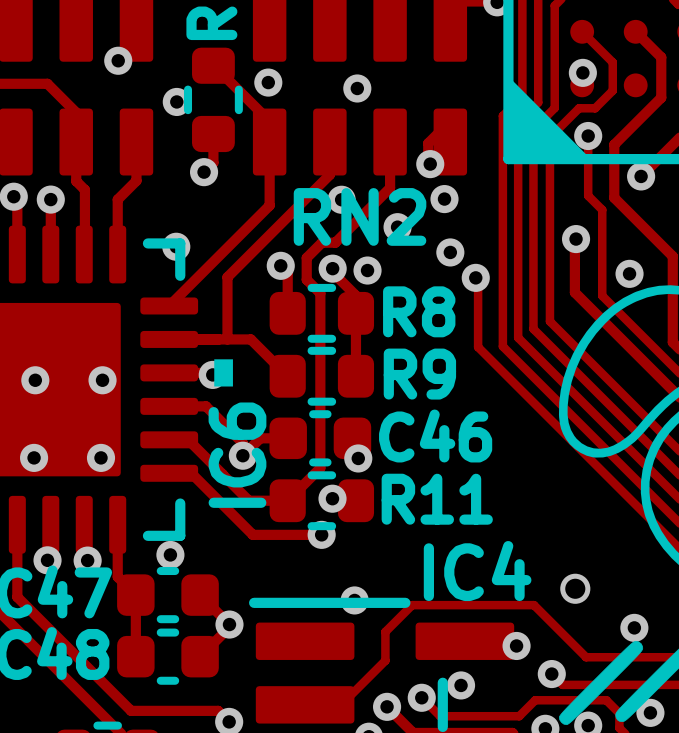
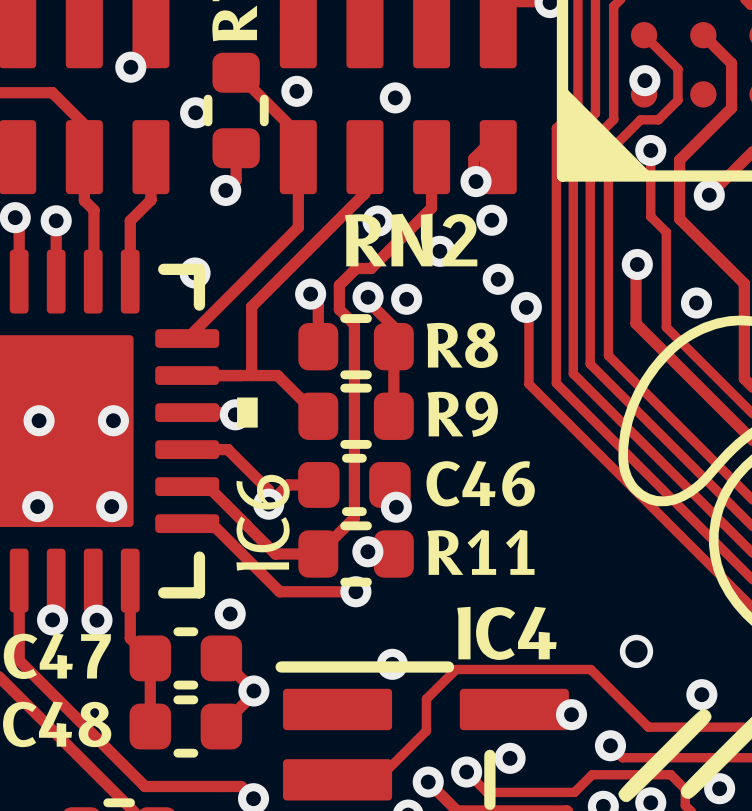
via position: (170, 554) -> (230, 613)

